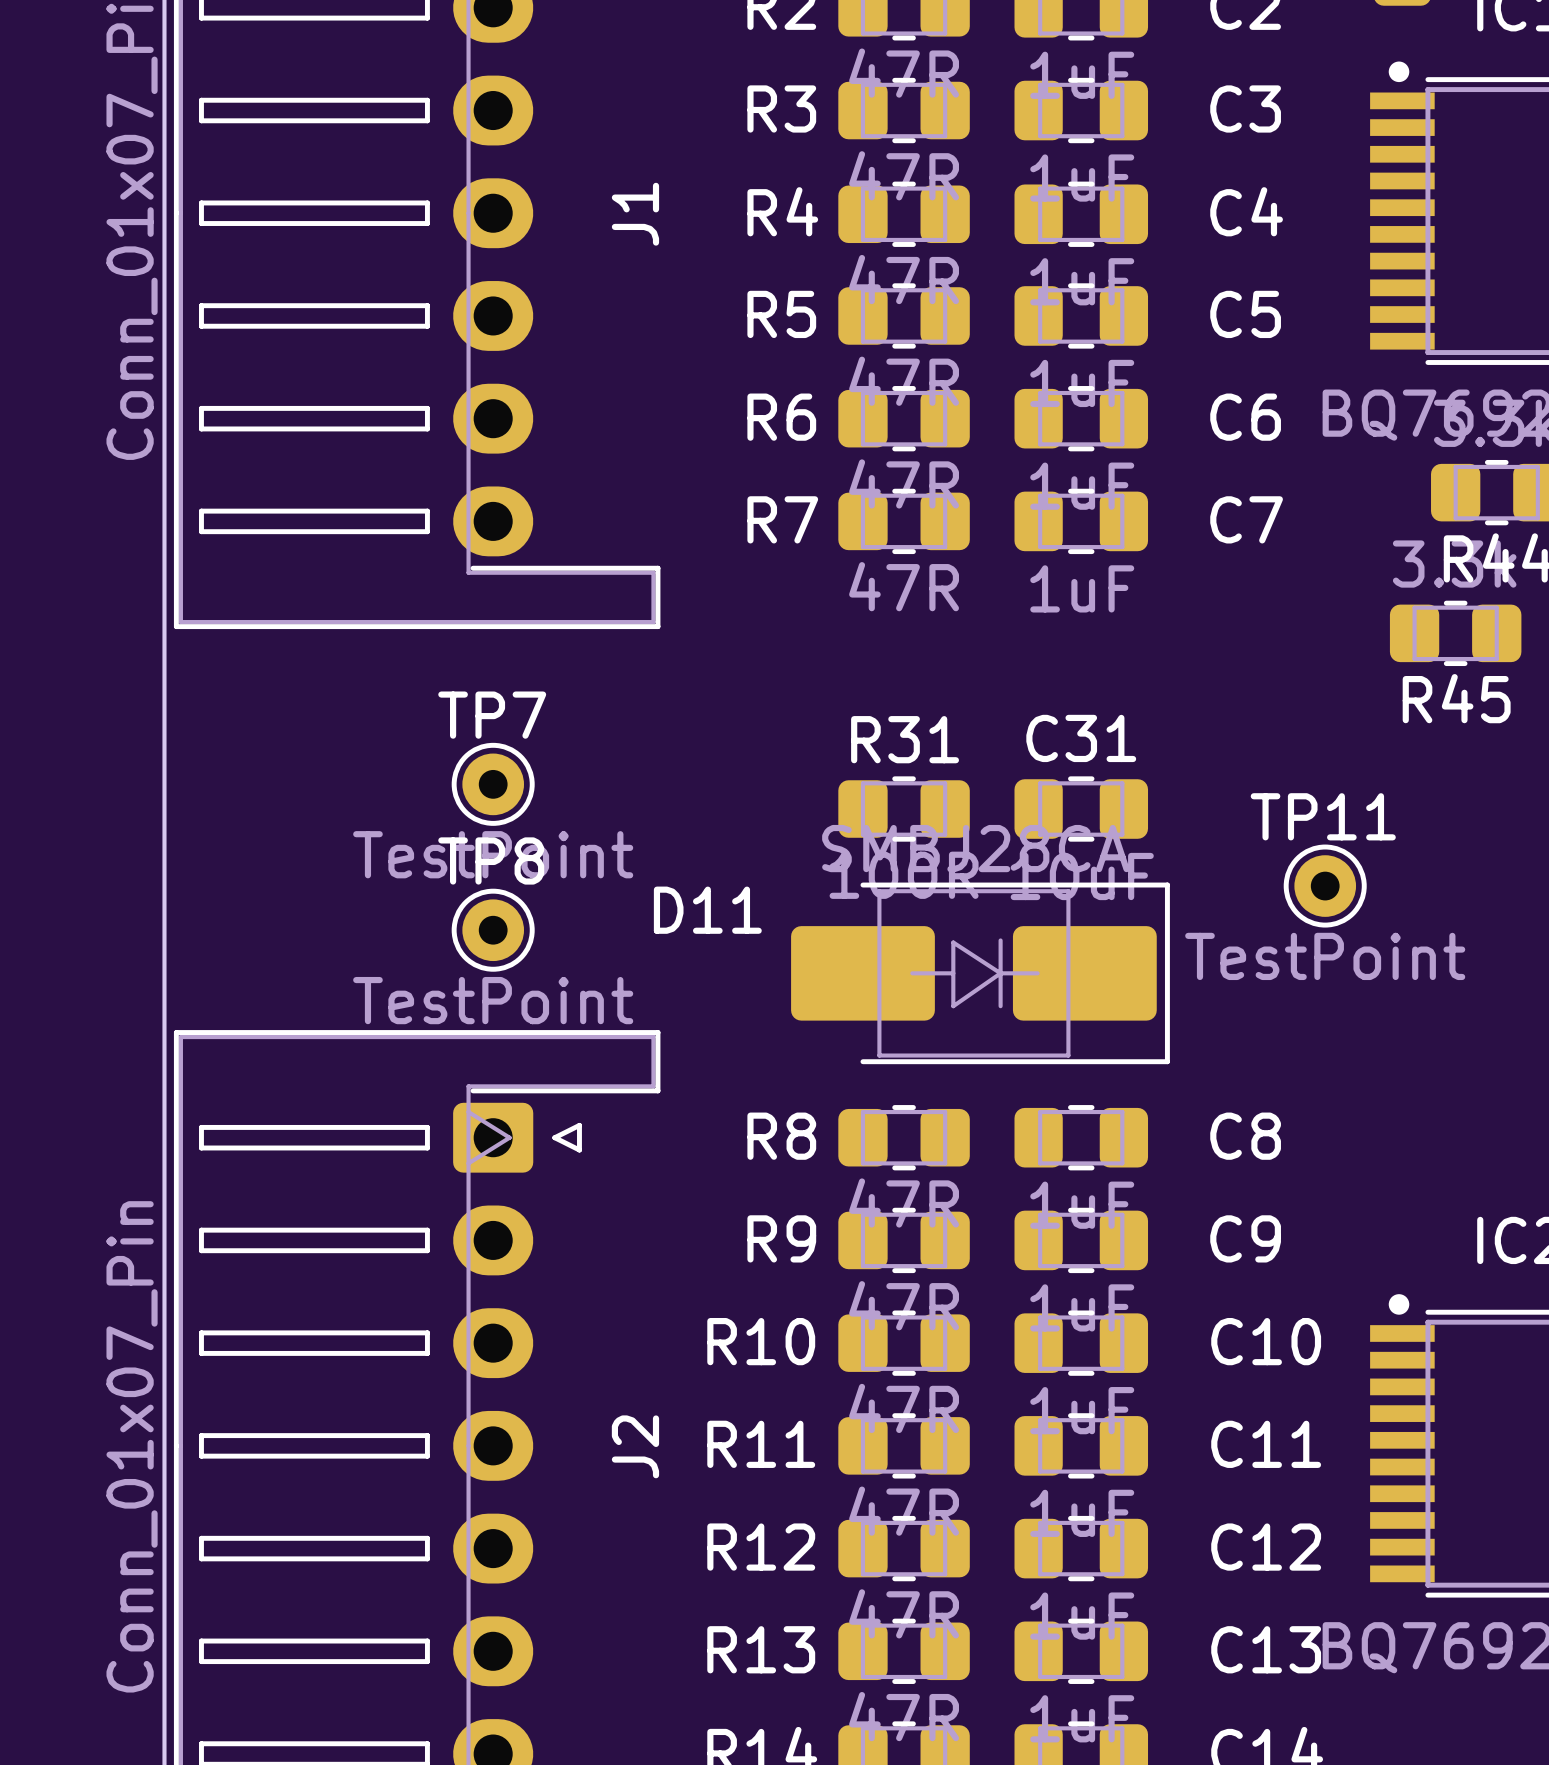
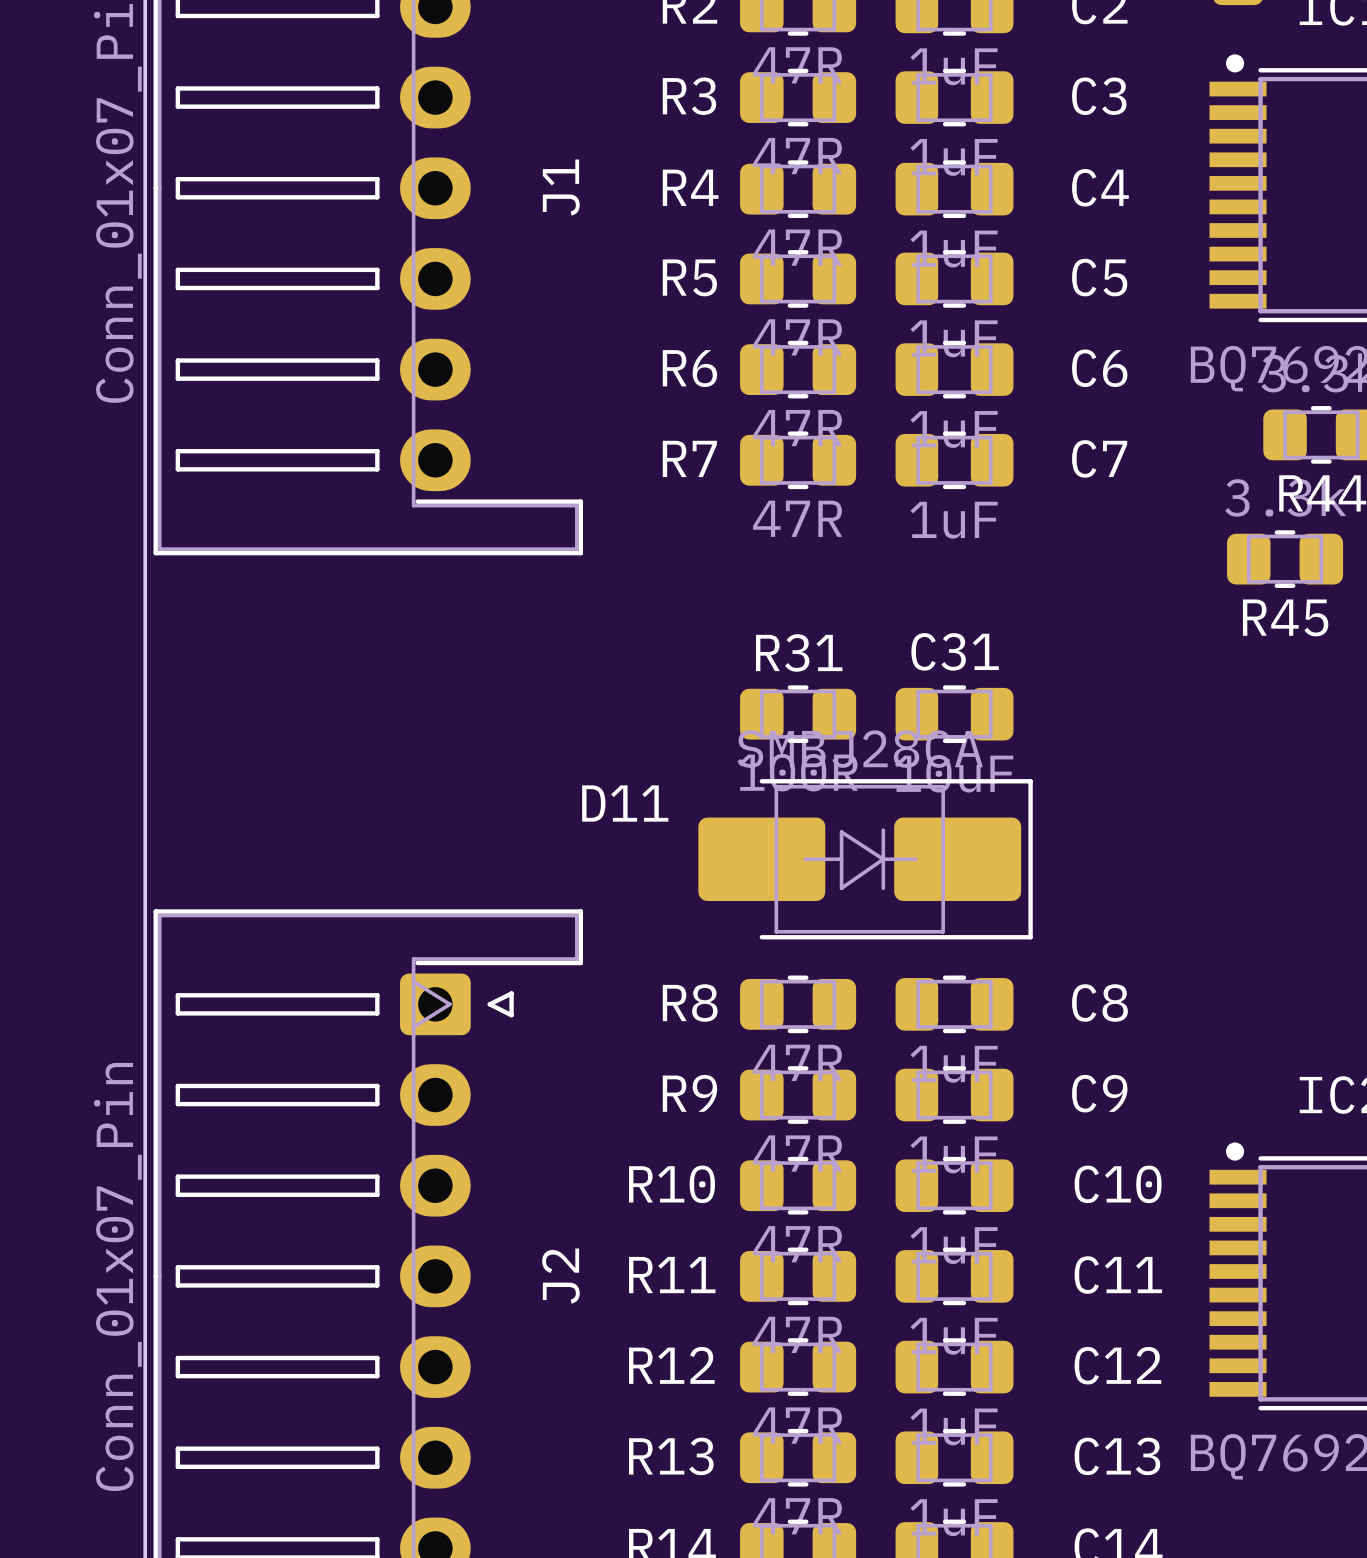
TP7: TestPoint (493, 784) -> none
TP11: TestPoint (1325, 886) -> none
TP8: TestPoint (493, 930) -> none

